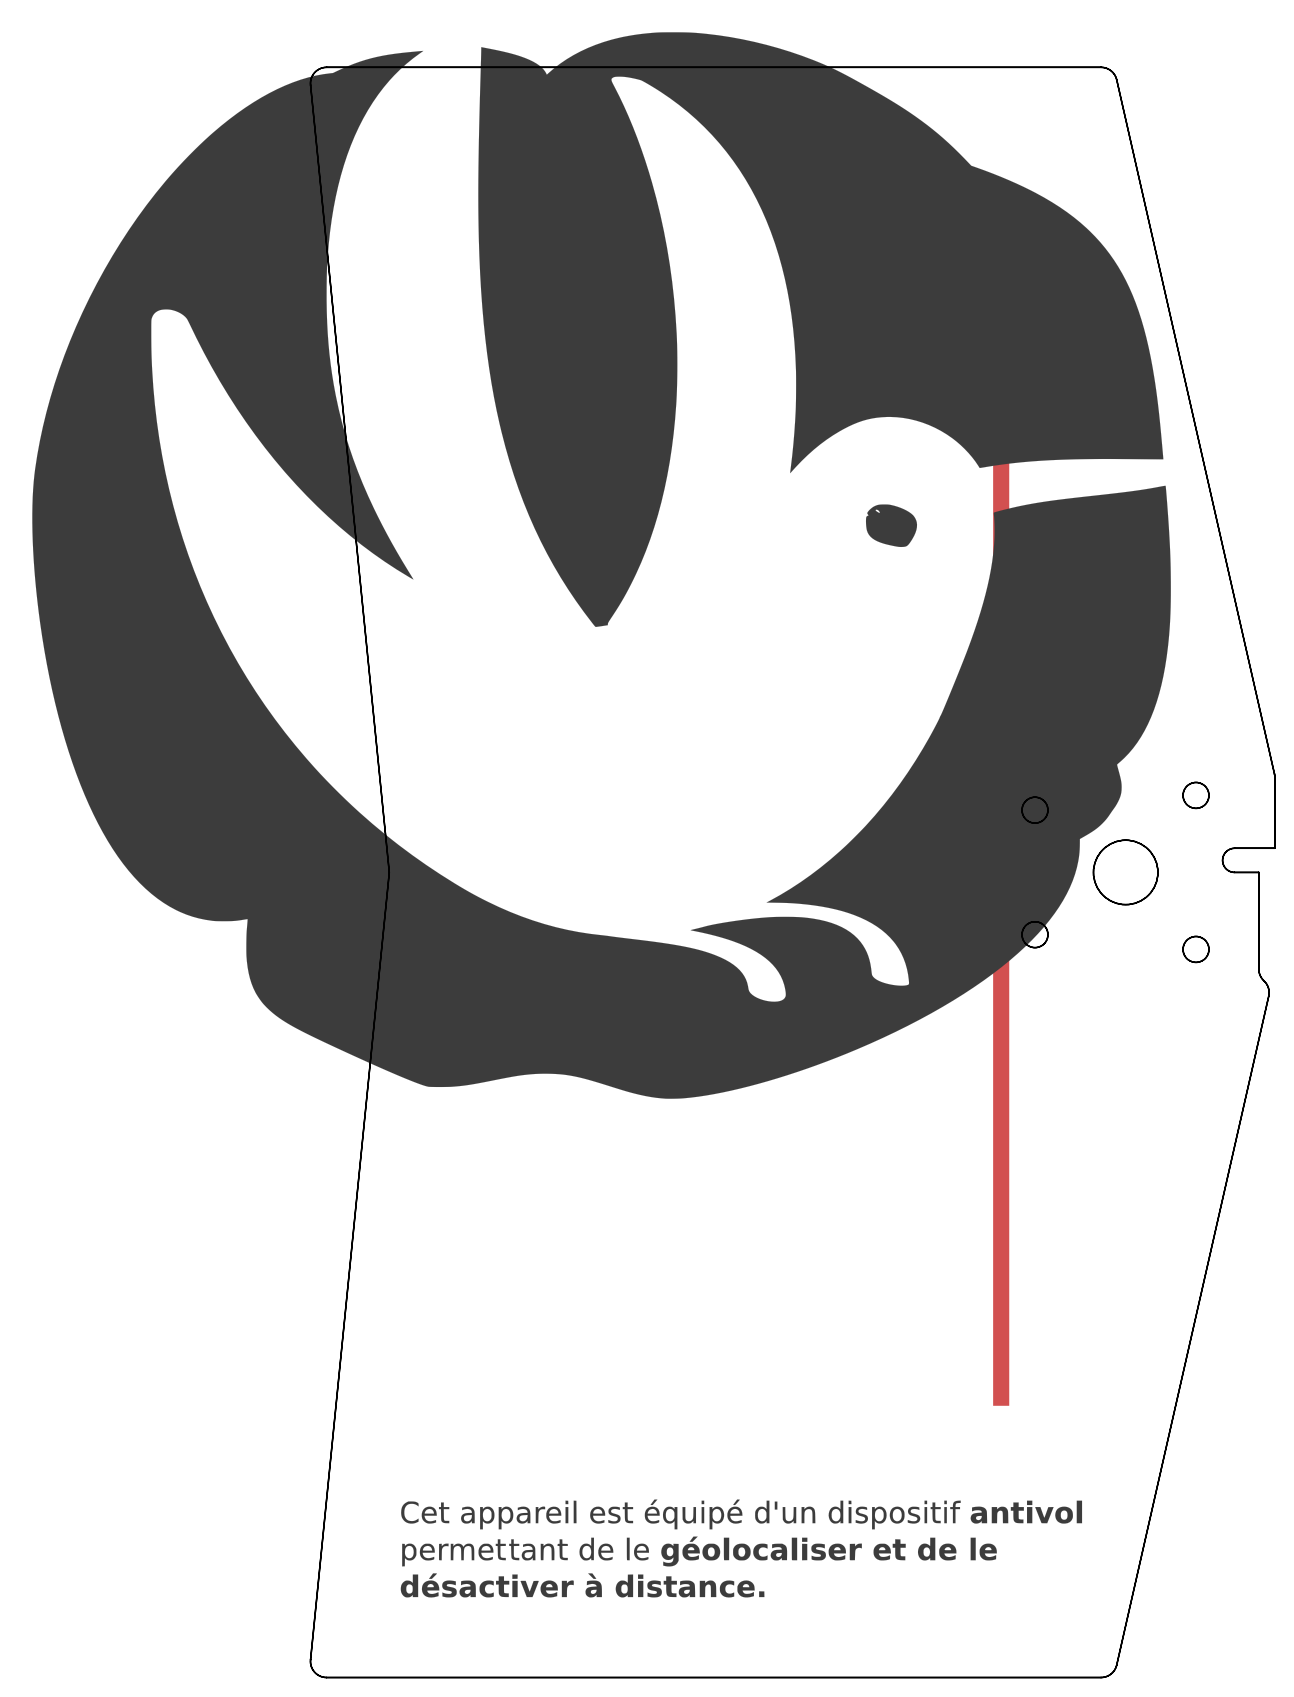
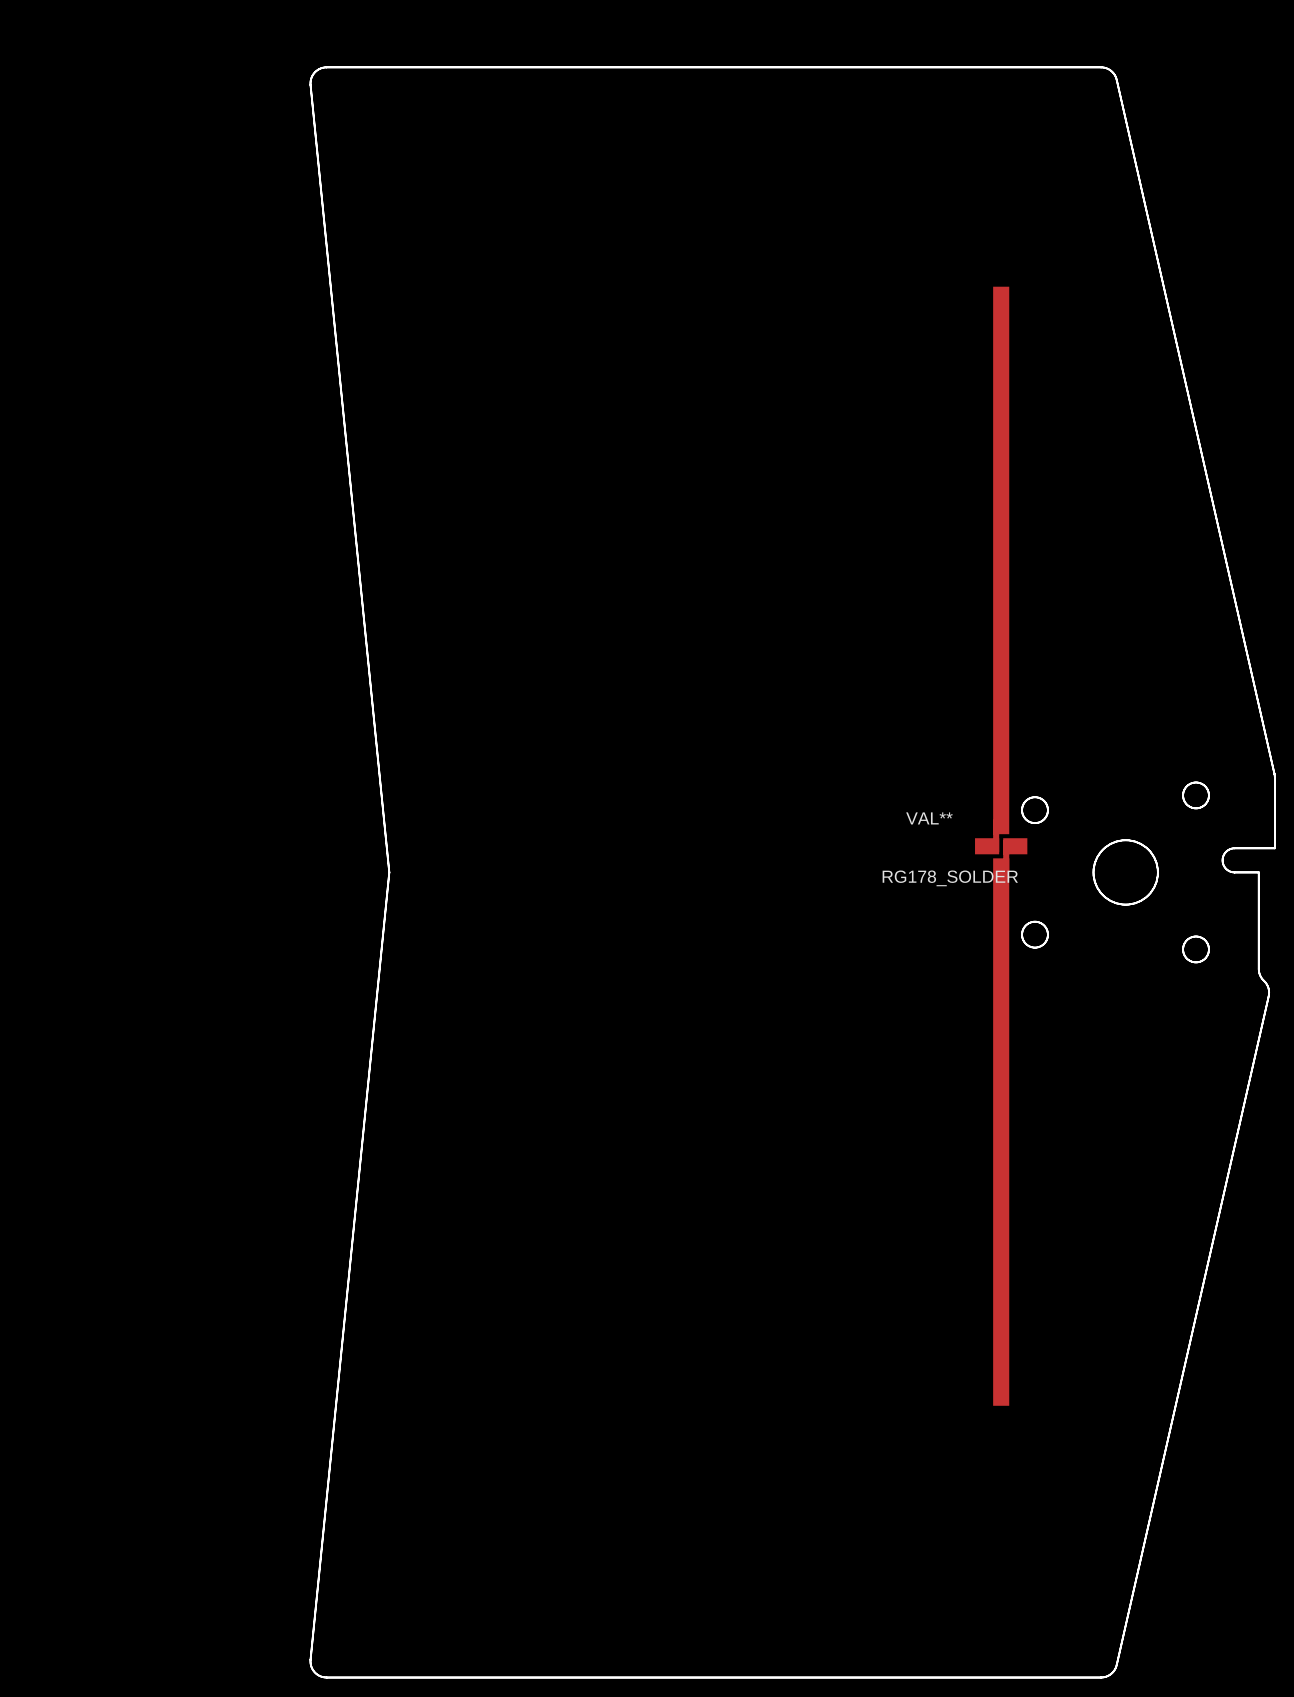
drawing: [32, 32, 1171, 1598] -> none

